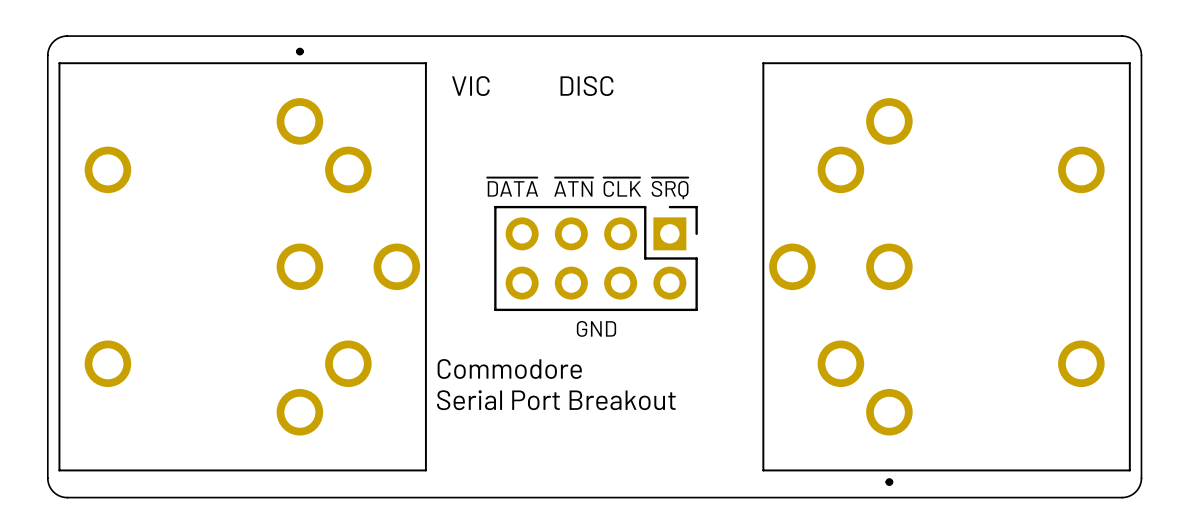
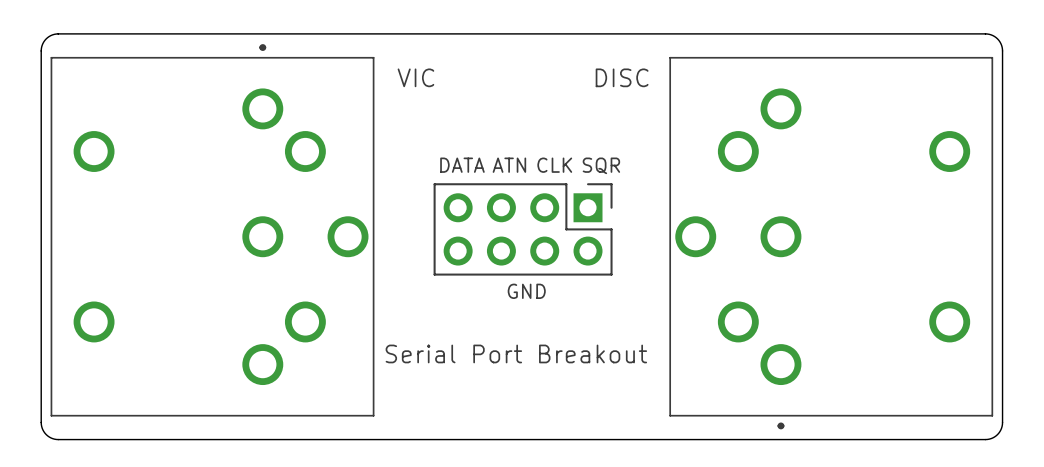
text: ~{DATA} (512, 187) -> DATA (462, 165)
text: ~{ATN} (573, 187) -> ATN (509, 165)
text: ~{CLK} (622, 187) -> CLK (554, 165)
text: ~{SRQ} (670, 188) -> SQR (601, 165)
text: Commodore (509, 368) -> none

